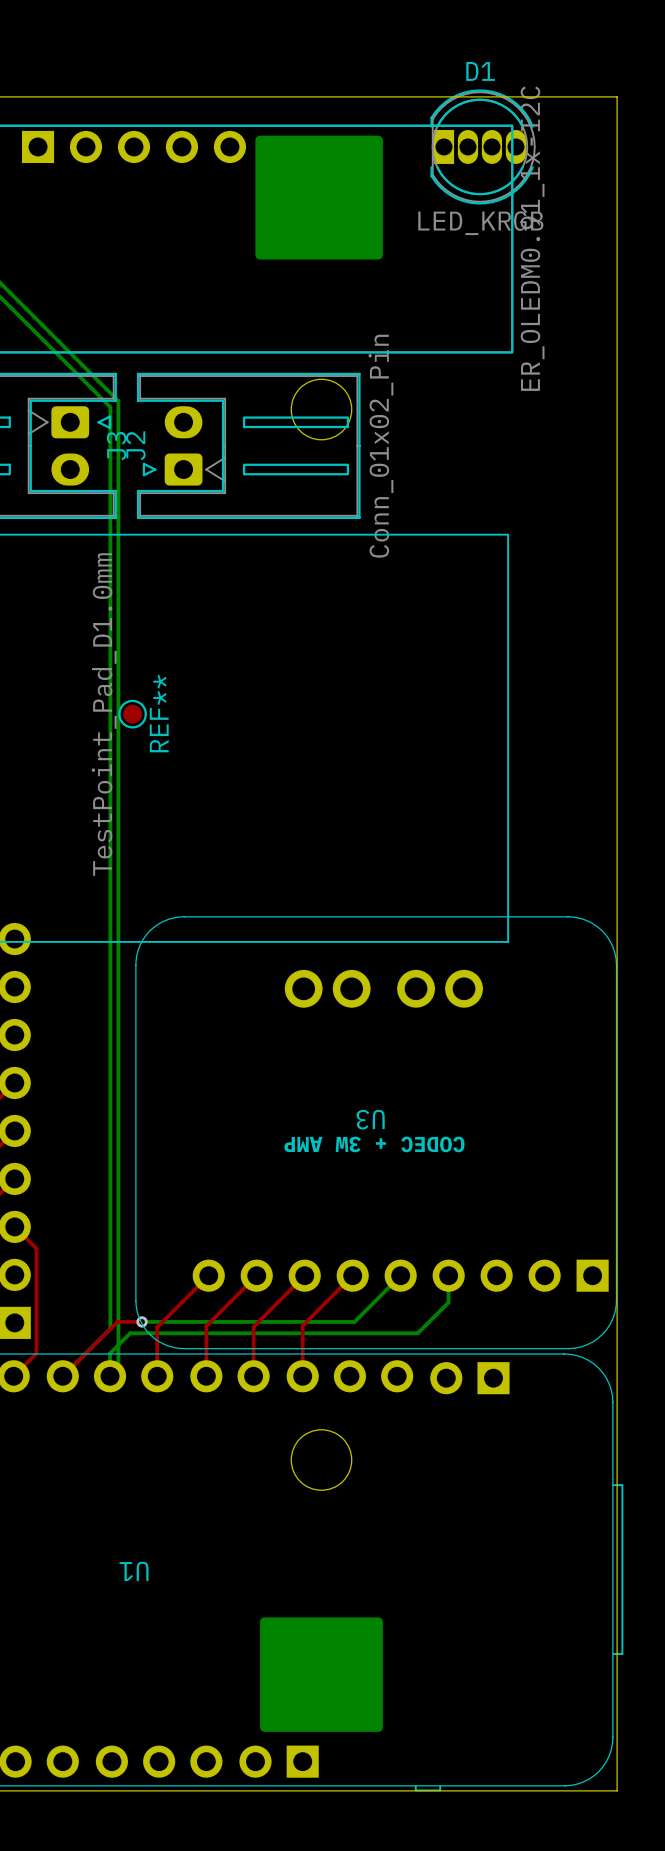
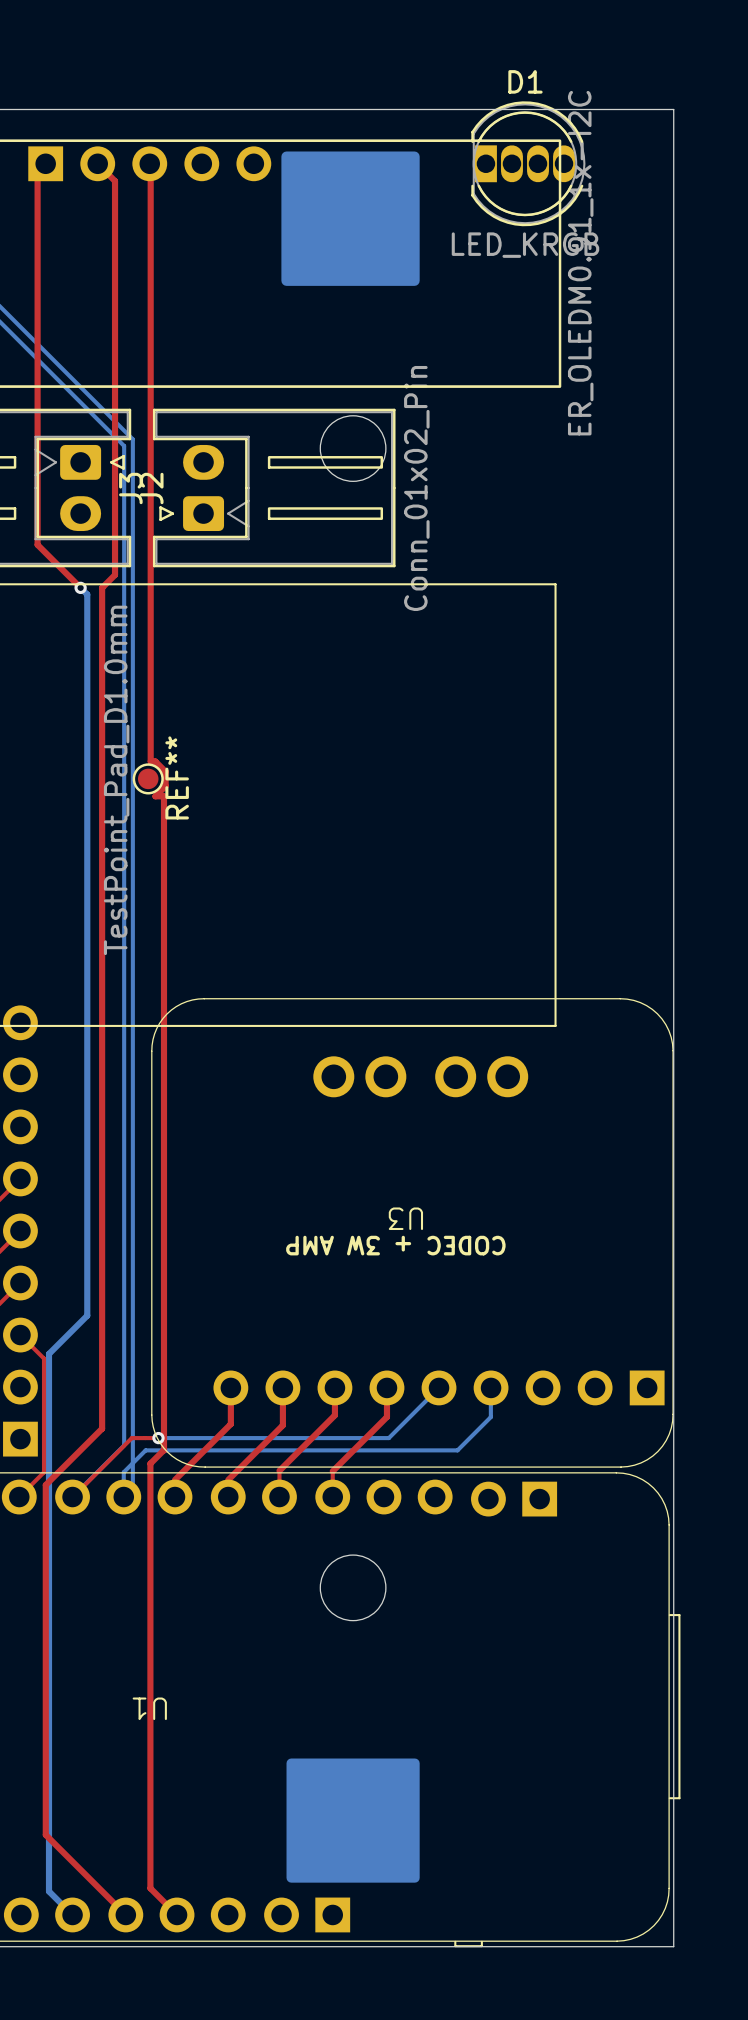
top track: none -> (45, 163) (37, 171) (37, 544) (80, 587)
top track: none -> (97, 163) (115, 181) (115, 574) (102, 587) (102, 1428) (45, 1485) (45, 1834) (125, 1914)
top track: none -> (149, 163) (150, 761) (155, 761) (165, 771) (165, 786) (155, 796) (164, 796) (164, 1450)
bottom track: none -> (80, 587) (87, 594) (87, 1315) (49, 1353) (49, 1891) (72, 1914)
via: none -> (80, 587)
top track: (208, 1275) (157, 1327) (157, 1360) -> (230, 1387) (230, 1424) (174, 1479)
top track: (256, 1275) (206, 1326) (206, 1360) -> (282, 1387) (282, 1425) (228, 1479)
top track: (304, 1275) (253, 1326) (253, 1352) -> (334, 1387) (334, 1415) (279, 1470)
top track: (352, 1275) (302, 1325) (302, 1352) -> (386, 1387) (386, 1417) (332, 1471)
top track: none -> (163, 1450) (150, 1463) (150, 1888) (177, 1914)

